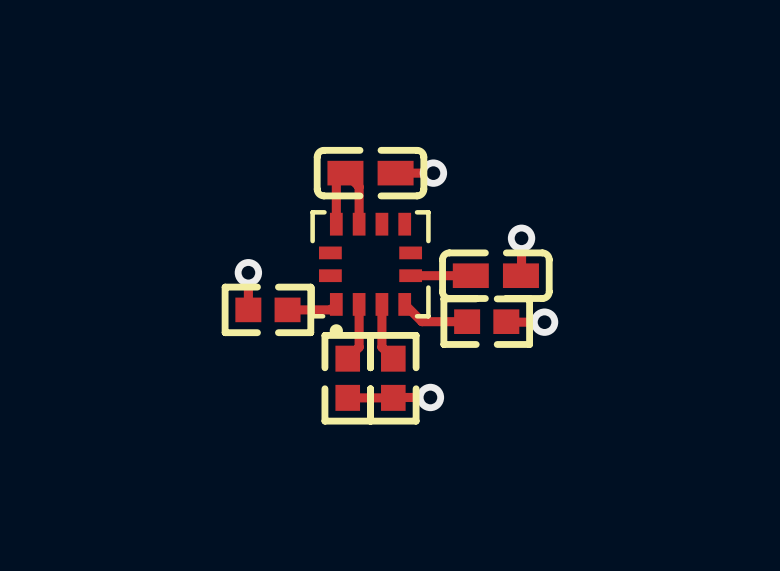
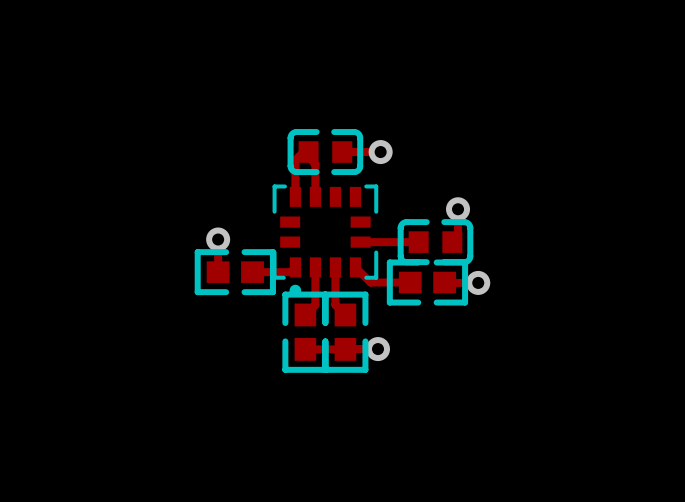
part footprint: [313, 146, 428, 200] -> [287, 129, 364, 176]
part footprint: [439, 249, 553, 302] -> [397, 219, 474, 266]

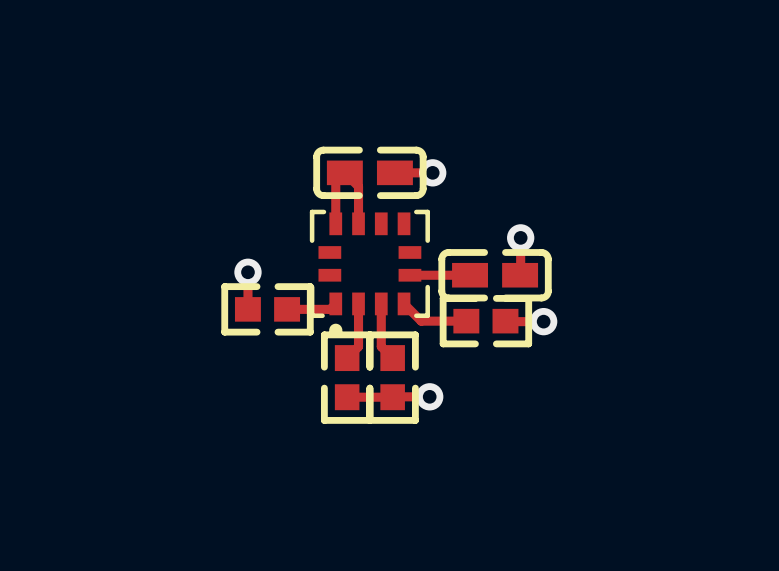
part footprint: [287, 129, 364, 176] -> [313, 146, 427, 200]
part footprint: [397, 219, 474, 266] -> [438, 249, 552, 302]

